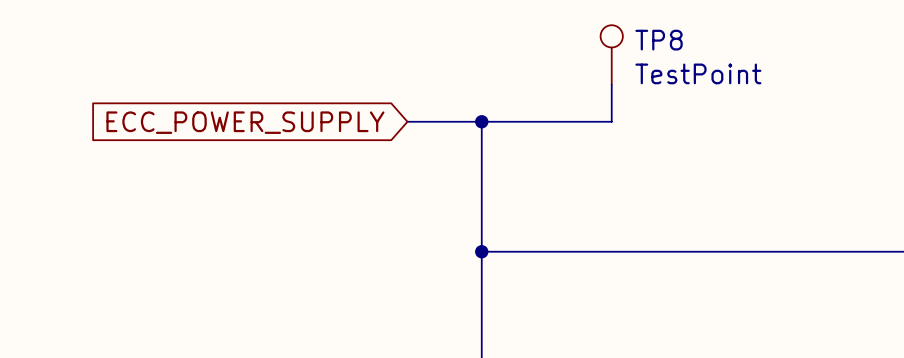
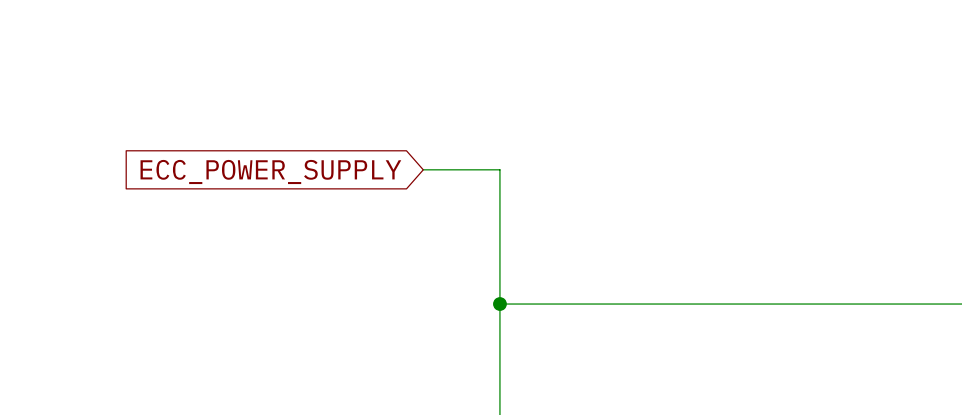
TP8: TestPoint (611, 54) -> none
wire: (611, 84) (611, 121) (481, 121) -> none
junction: (481, 121) -> none

